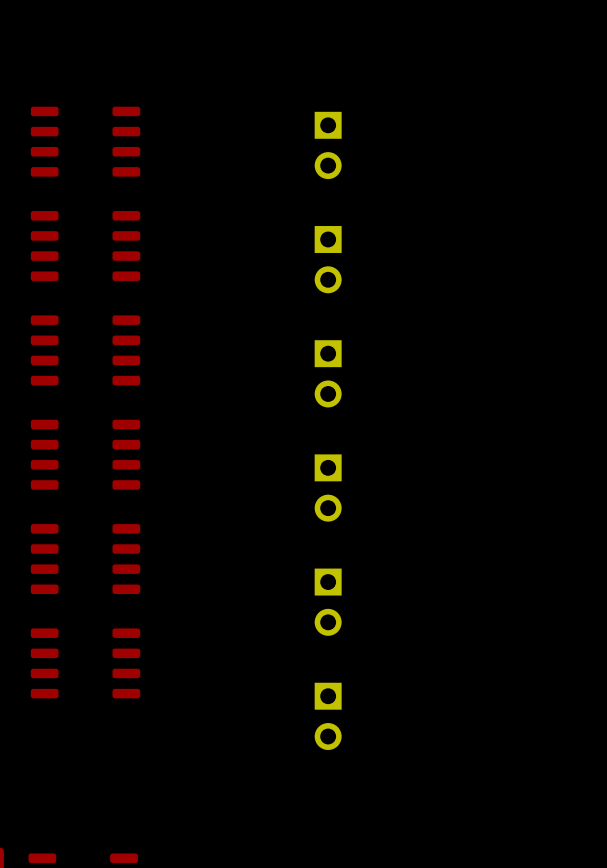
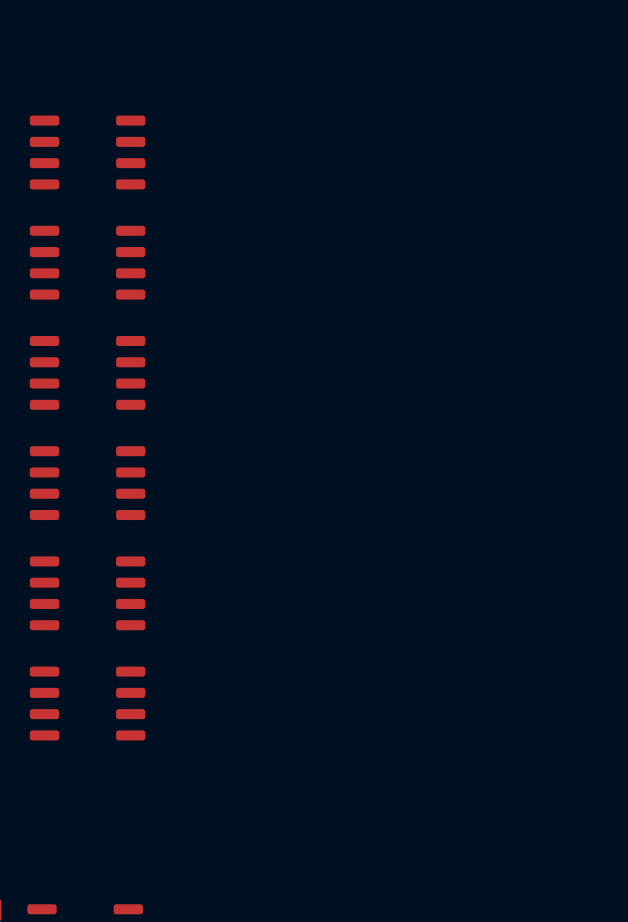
part: (328, 145) -> none
part: (328, 259) -> none
part: (328, 373) -> none
part: (328, 488) -> none
part: (328, 602) -> none
part: (328, 716) -> none

